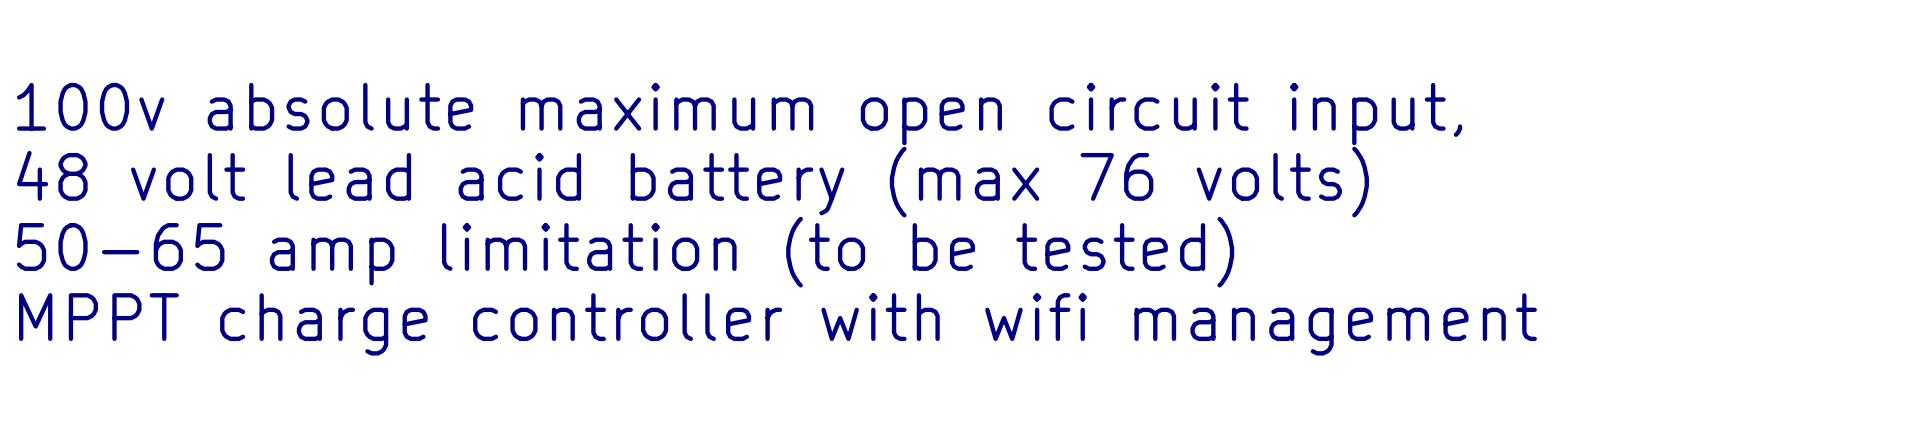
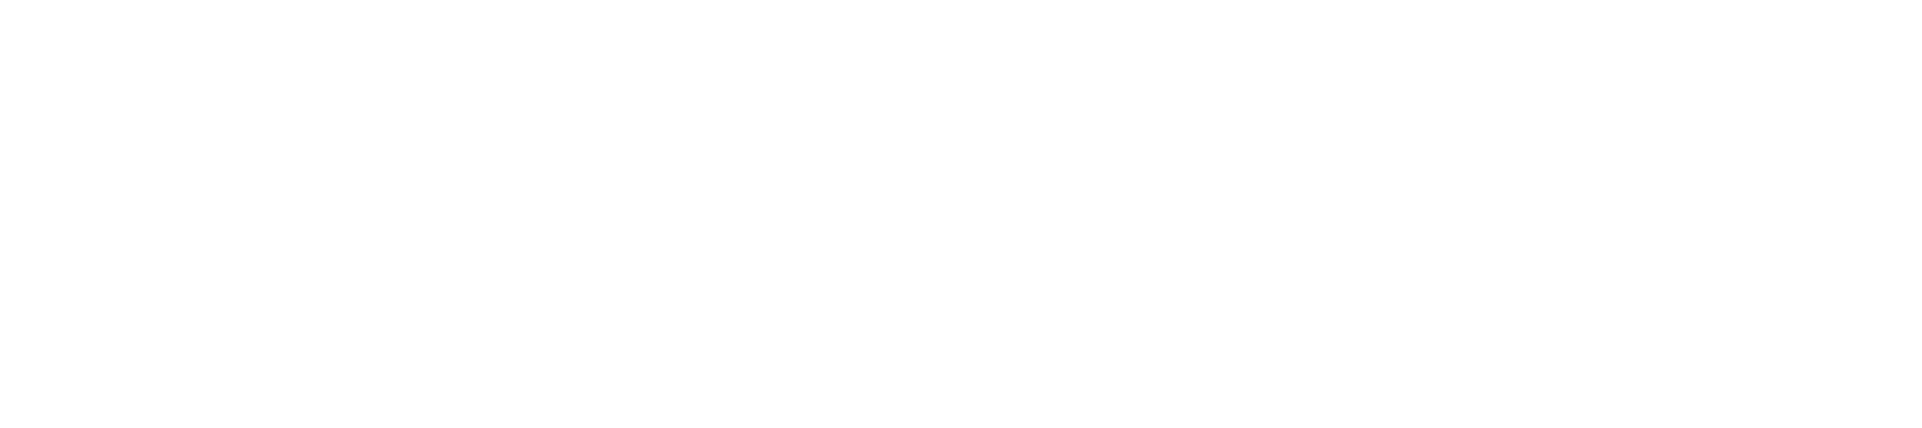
text: 100v absolute maximum open circuit input, (739, 114) -> none
text: 48 volt lead acid battery (max 76 volts) (692, 182) -> none
text: 50-65 amp limitation (to be tested) (625, 252) -> none
text: MPPT charge controller with wifi management (777, 324) -> none

